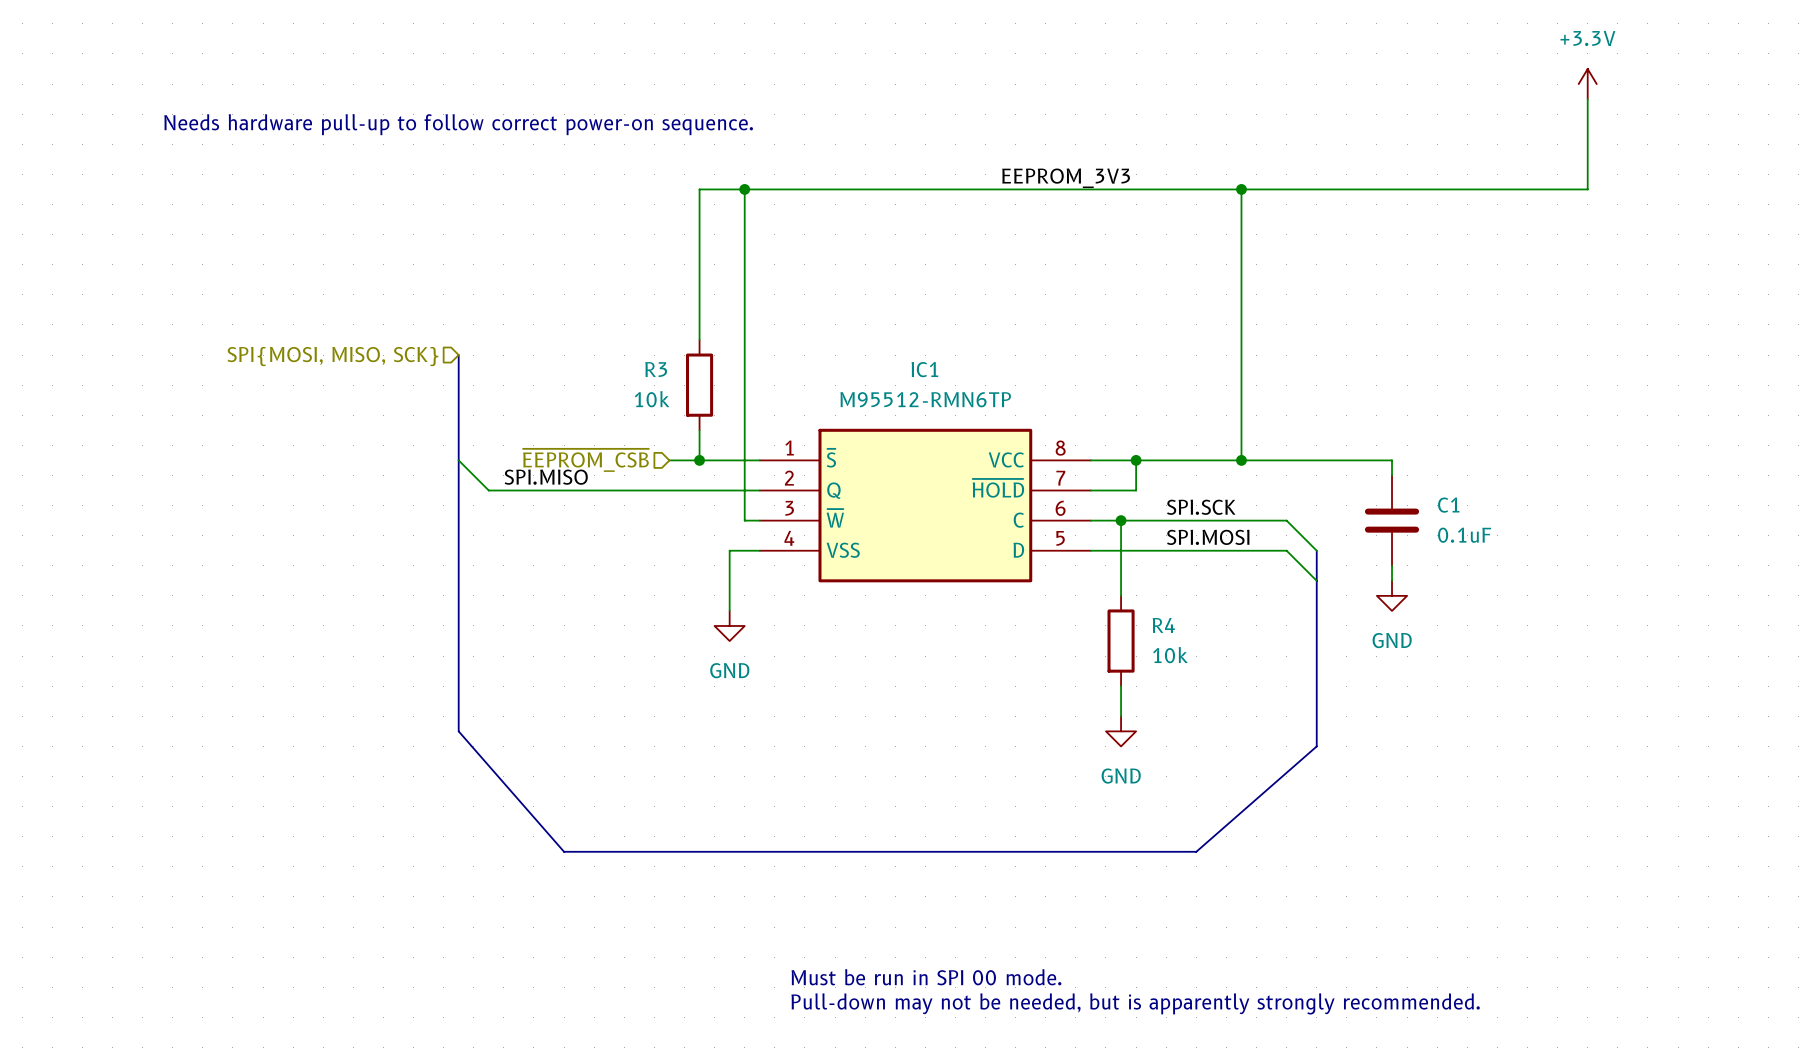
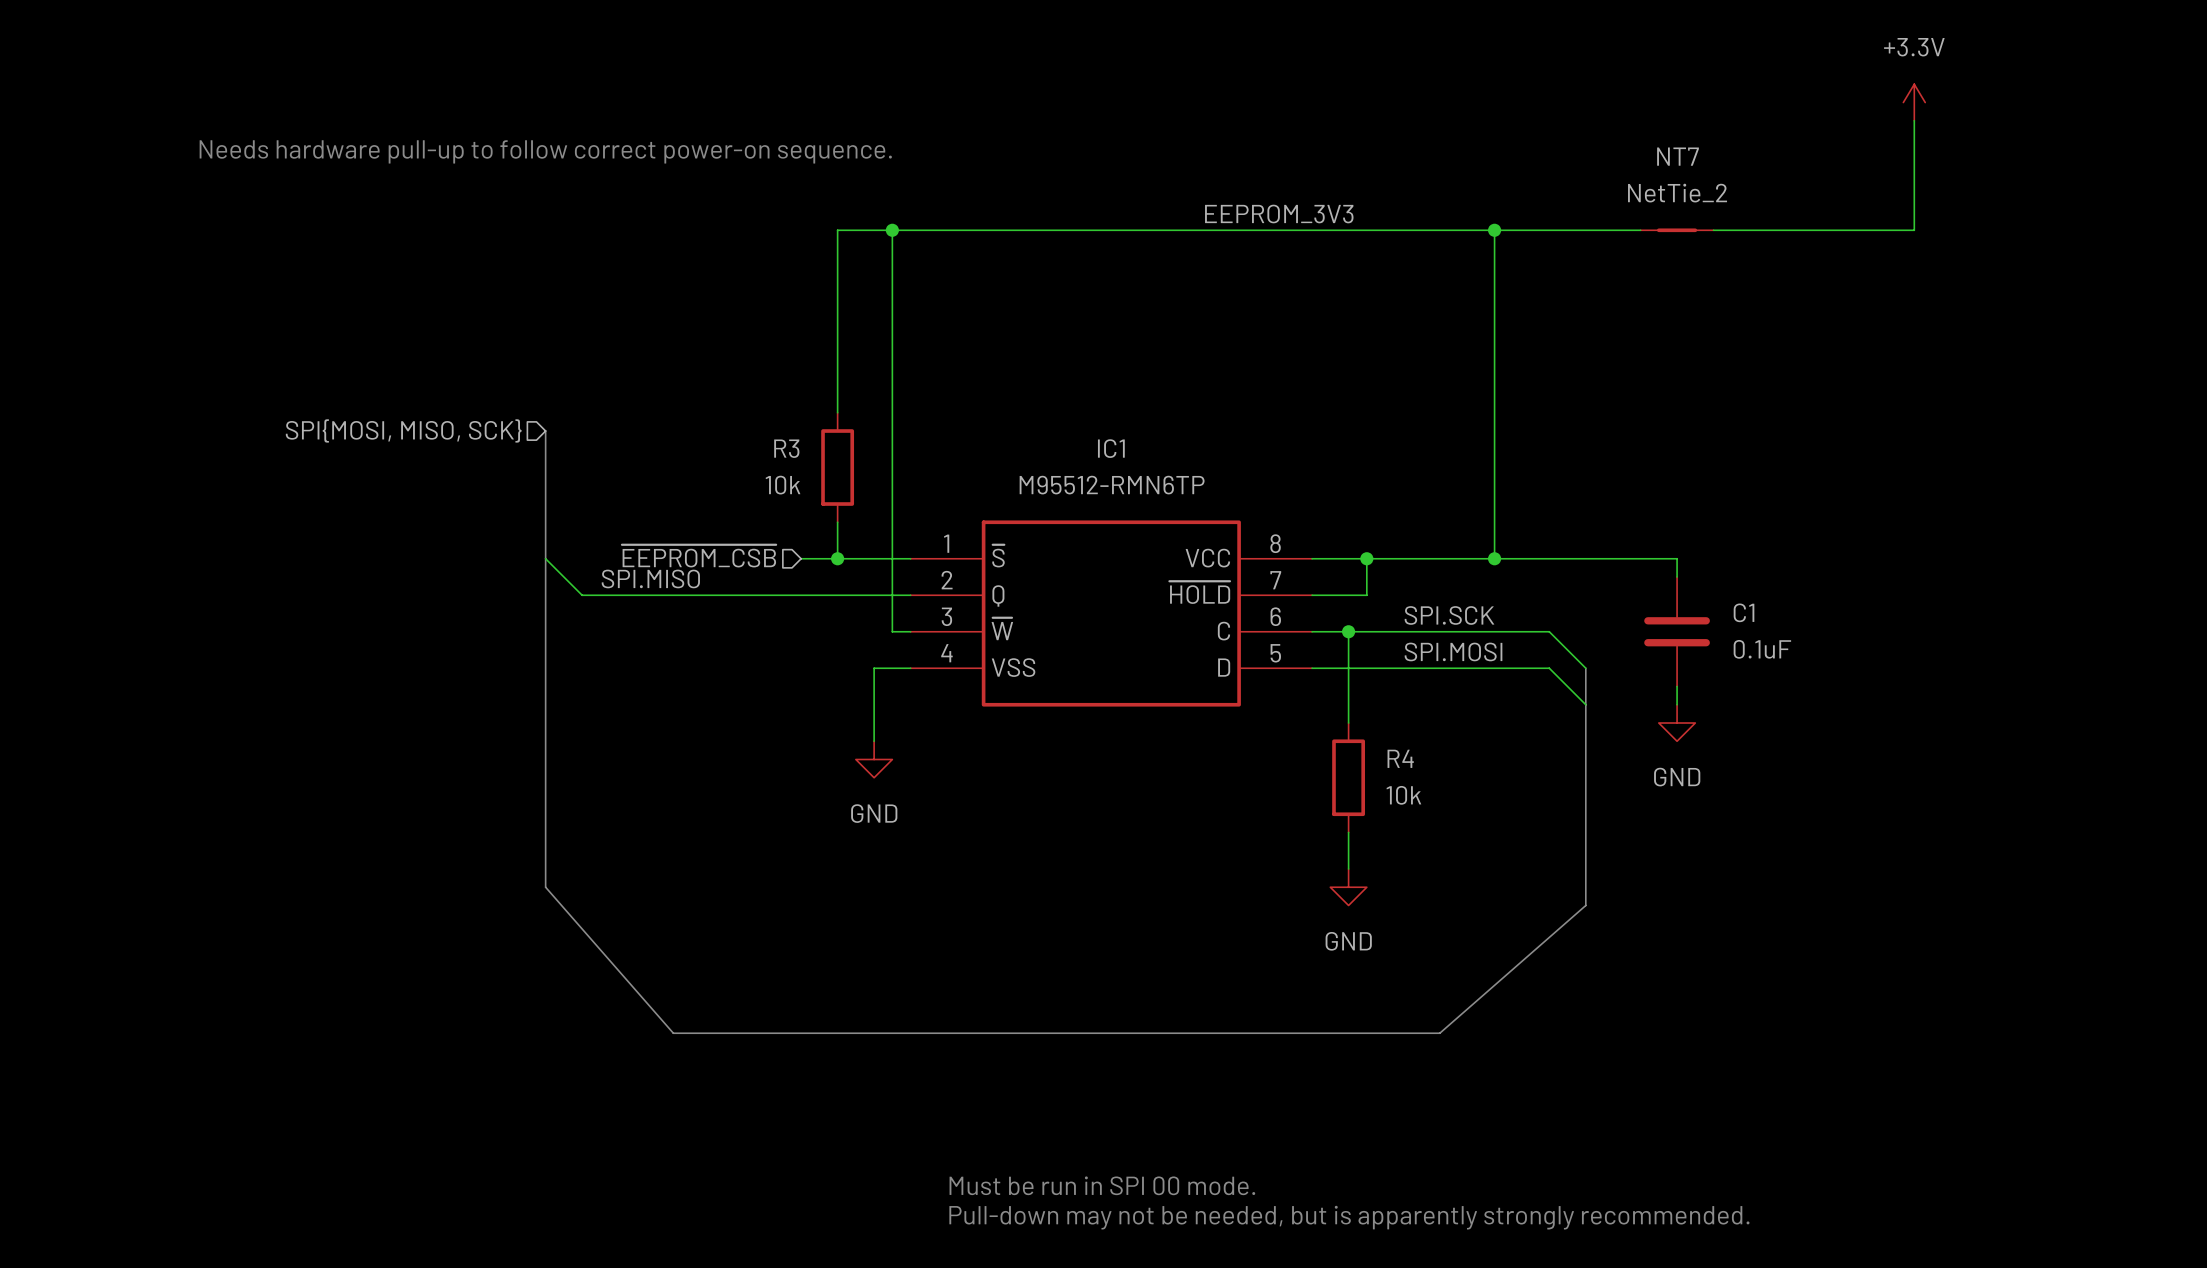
NT7: none -> NetTie_2 (1677, 230)

